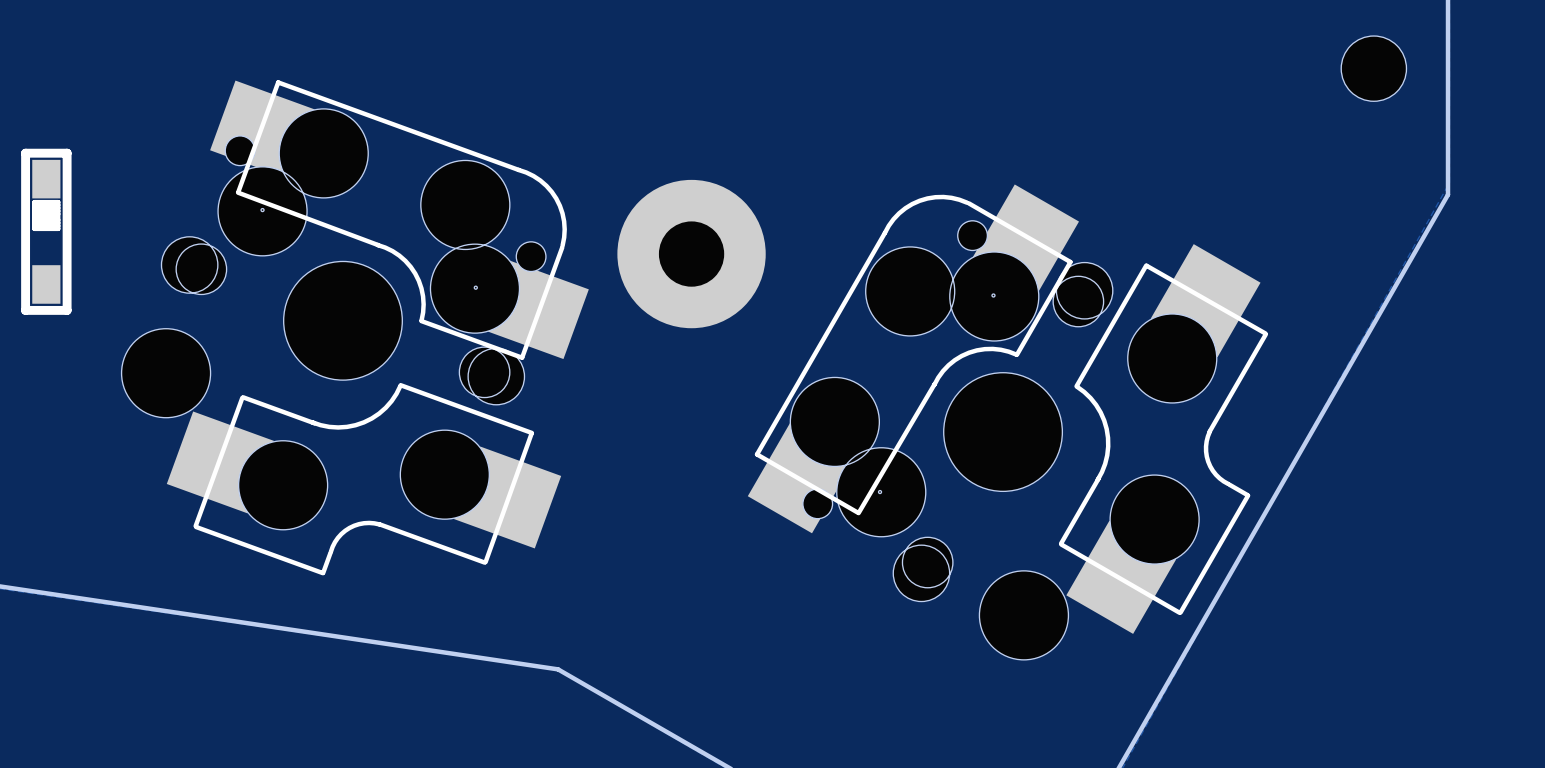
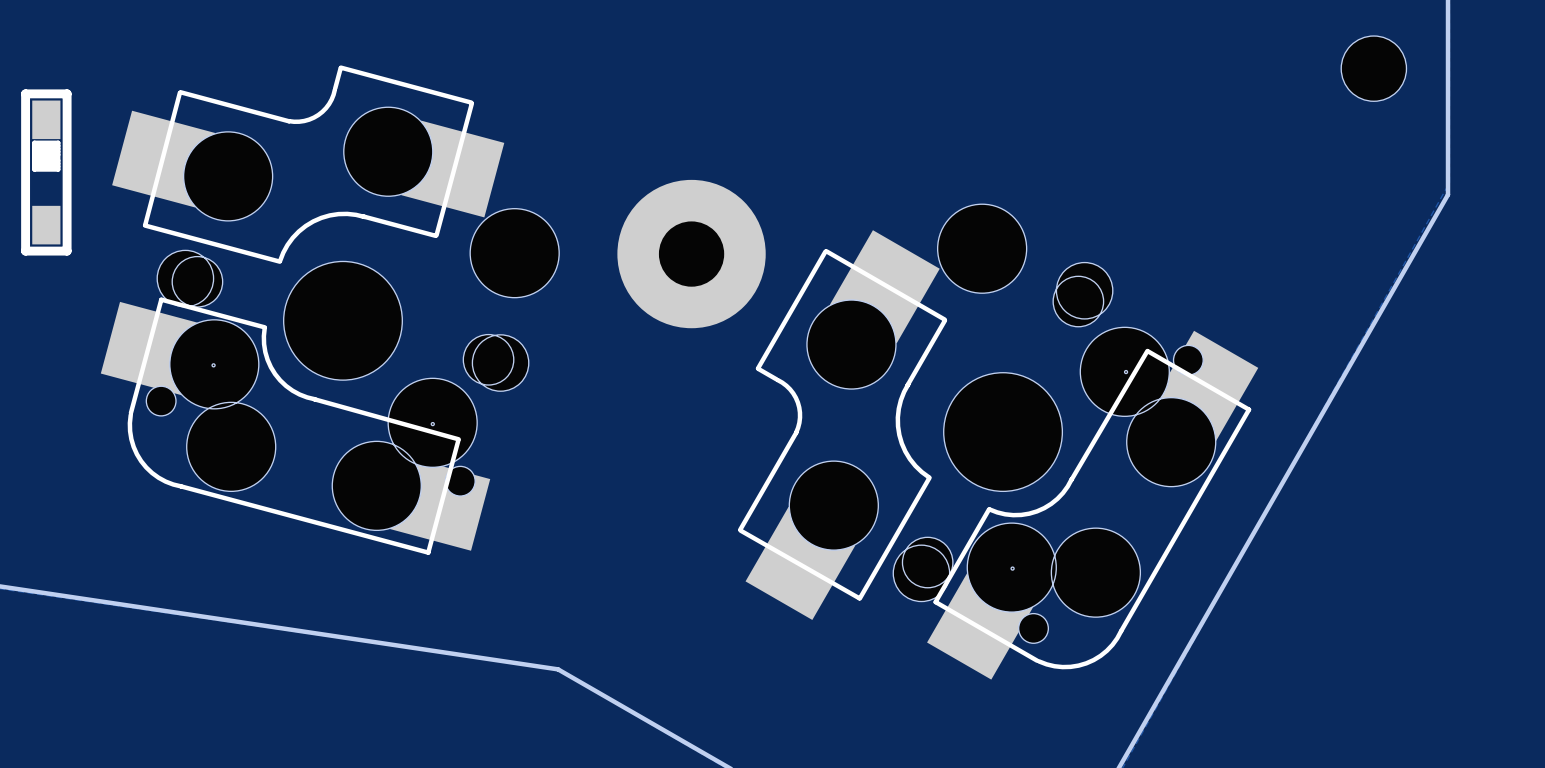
part: none -> (46, 172)
part: (46, 231) -> none
part: none -> (329, 310)
part: (355, 327) -> none
part rotation: 0° (1007, 422) -> 180° (998, 441)

